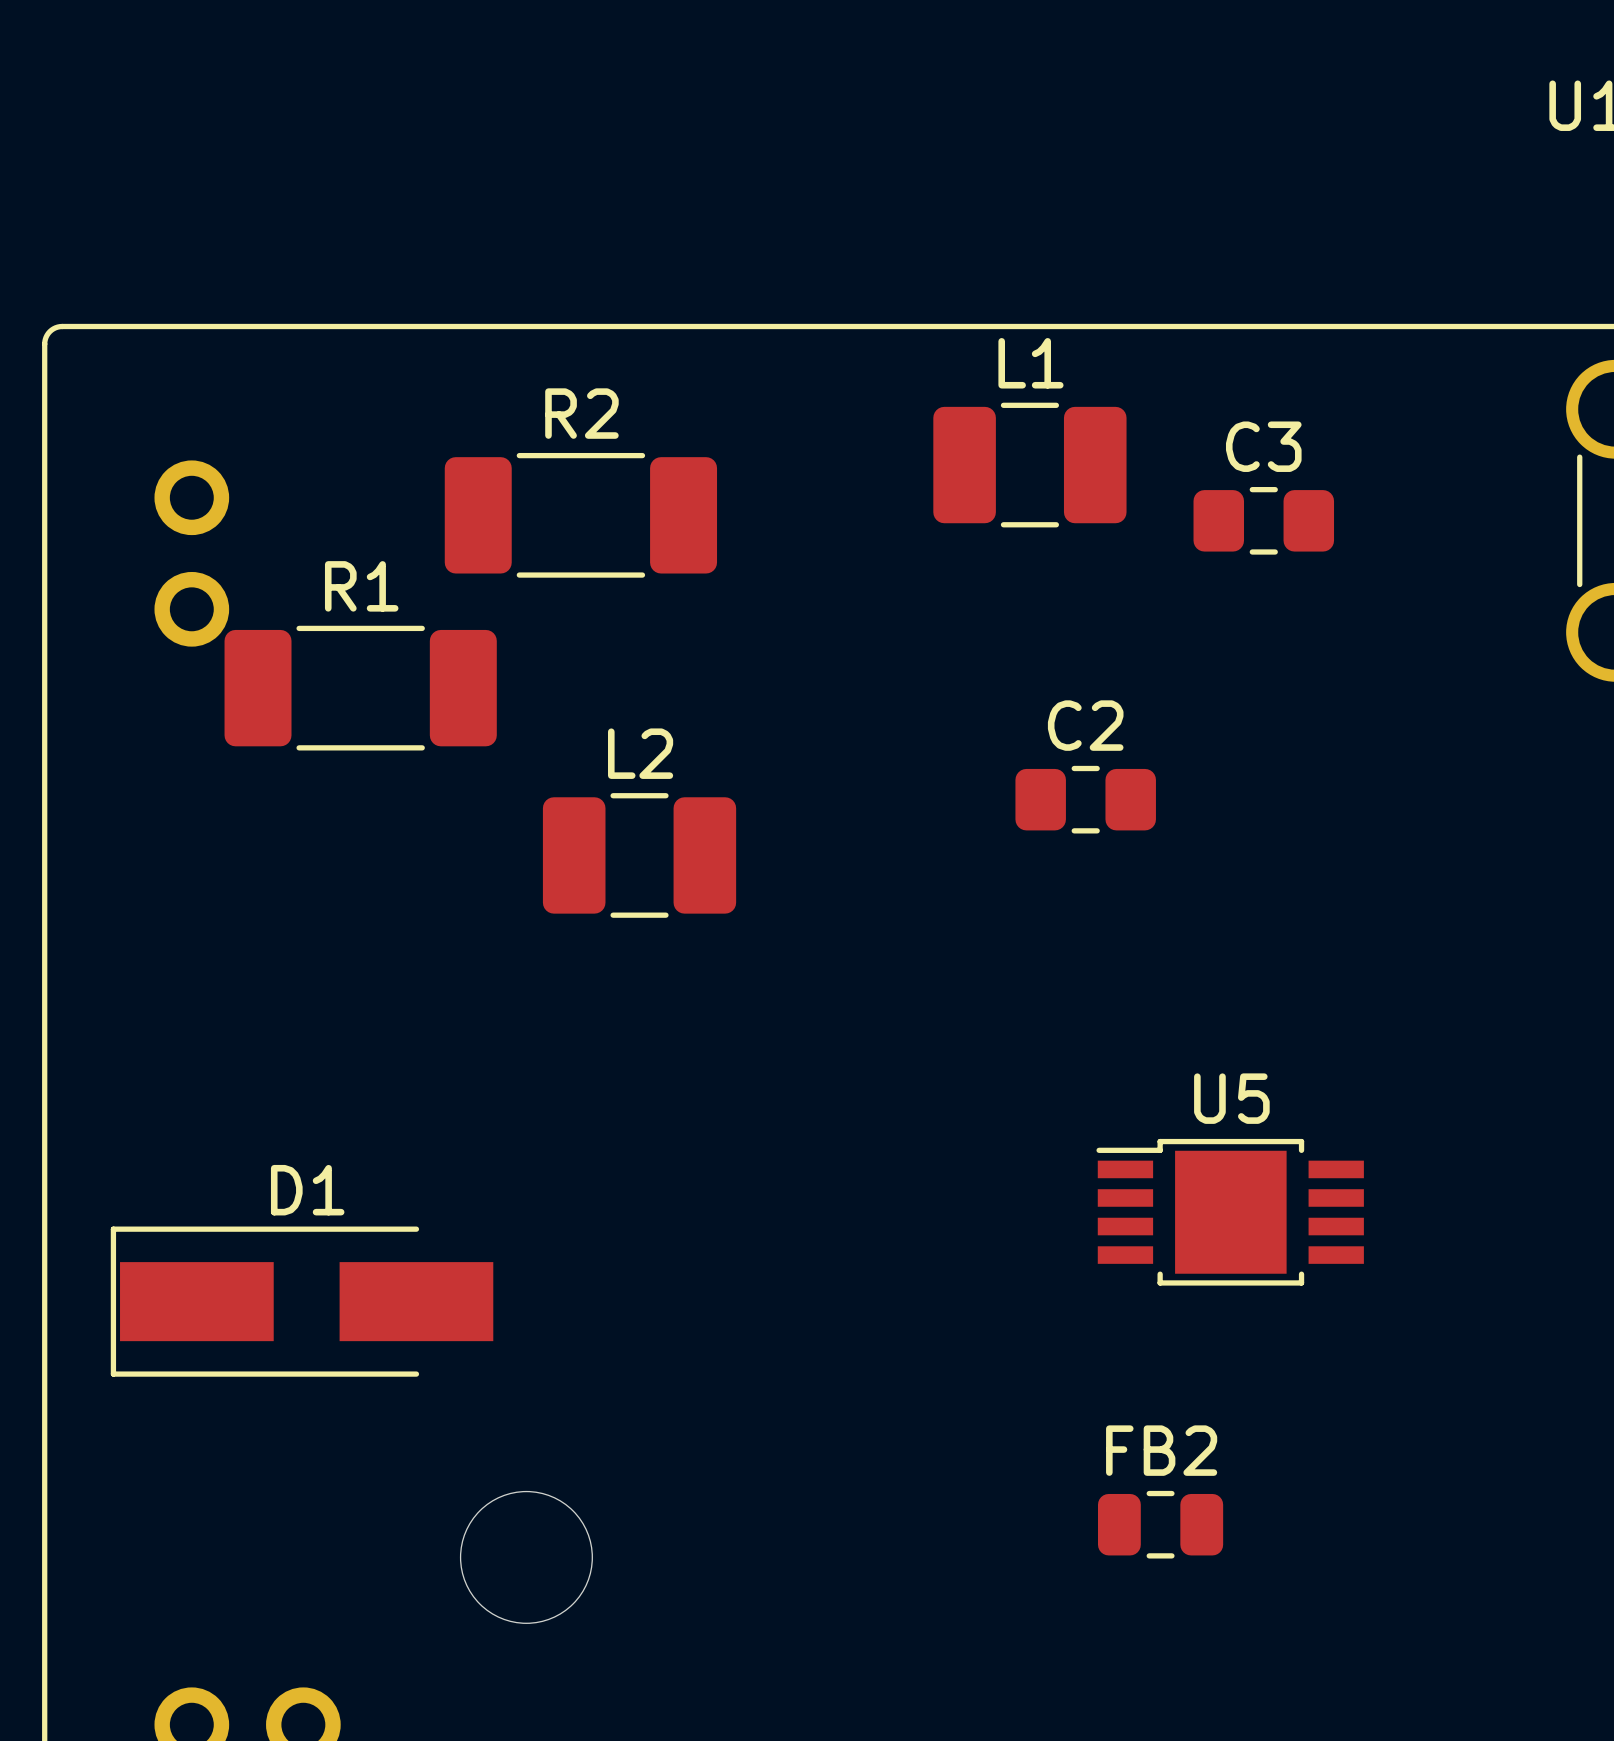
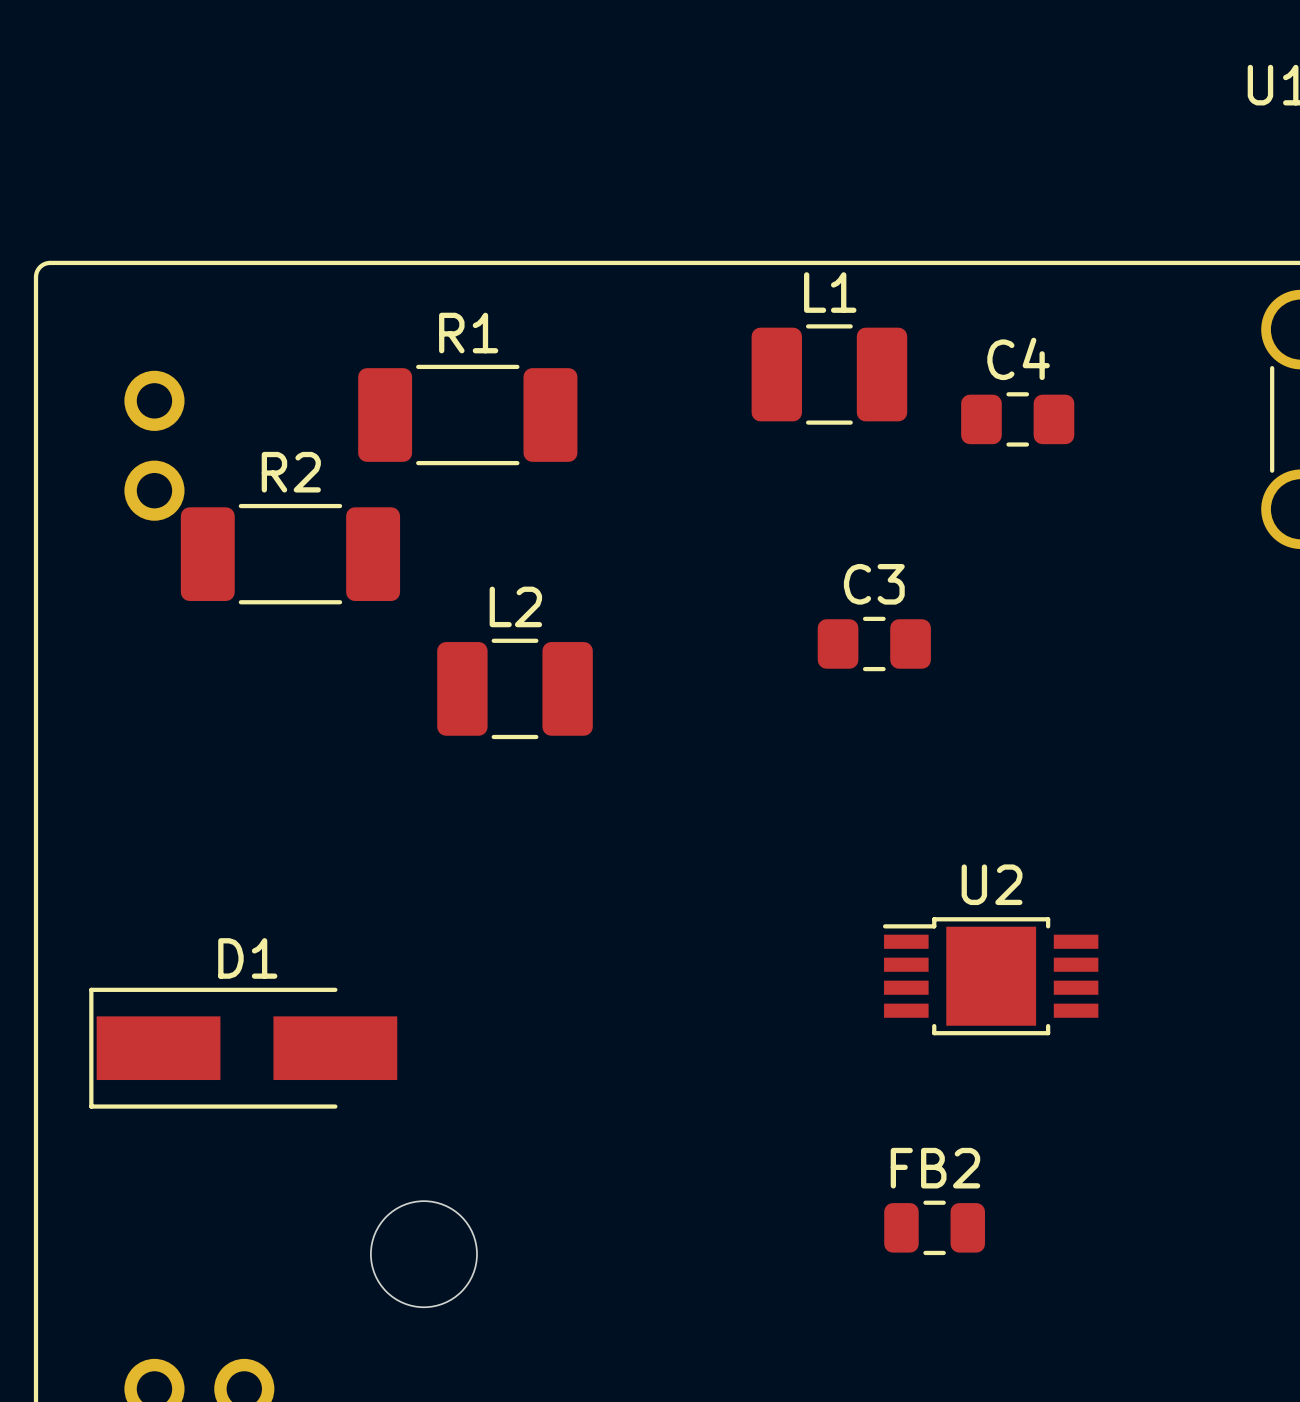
R2 name: R2 (581, 413) -> R1 (468, 333)
C3 name: C3 (1263, 446) -> C4 (1018, 358)
R1 name: R1 (361, 586) -> R2 (291, 472)
C2 name: C2 (1085, 725) -> C3 (874, 584)
U5 name: U5 (1231, 1098) -> U2 (992, 884)

